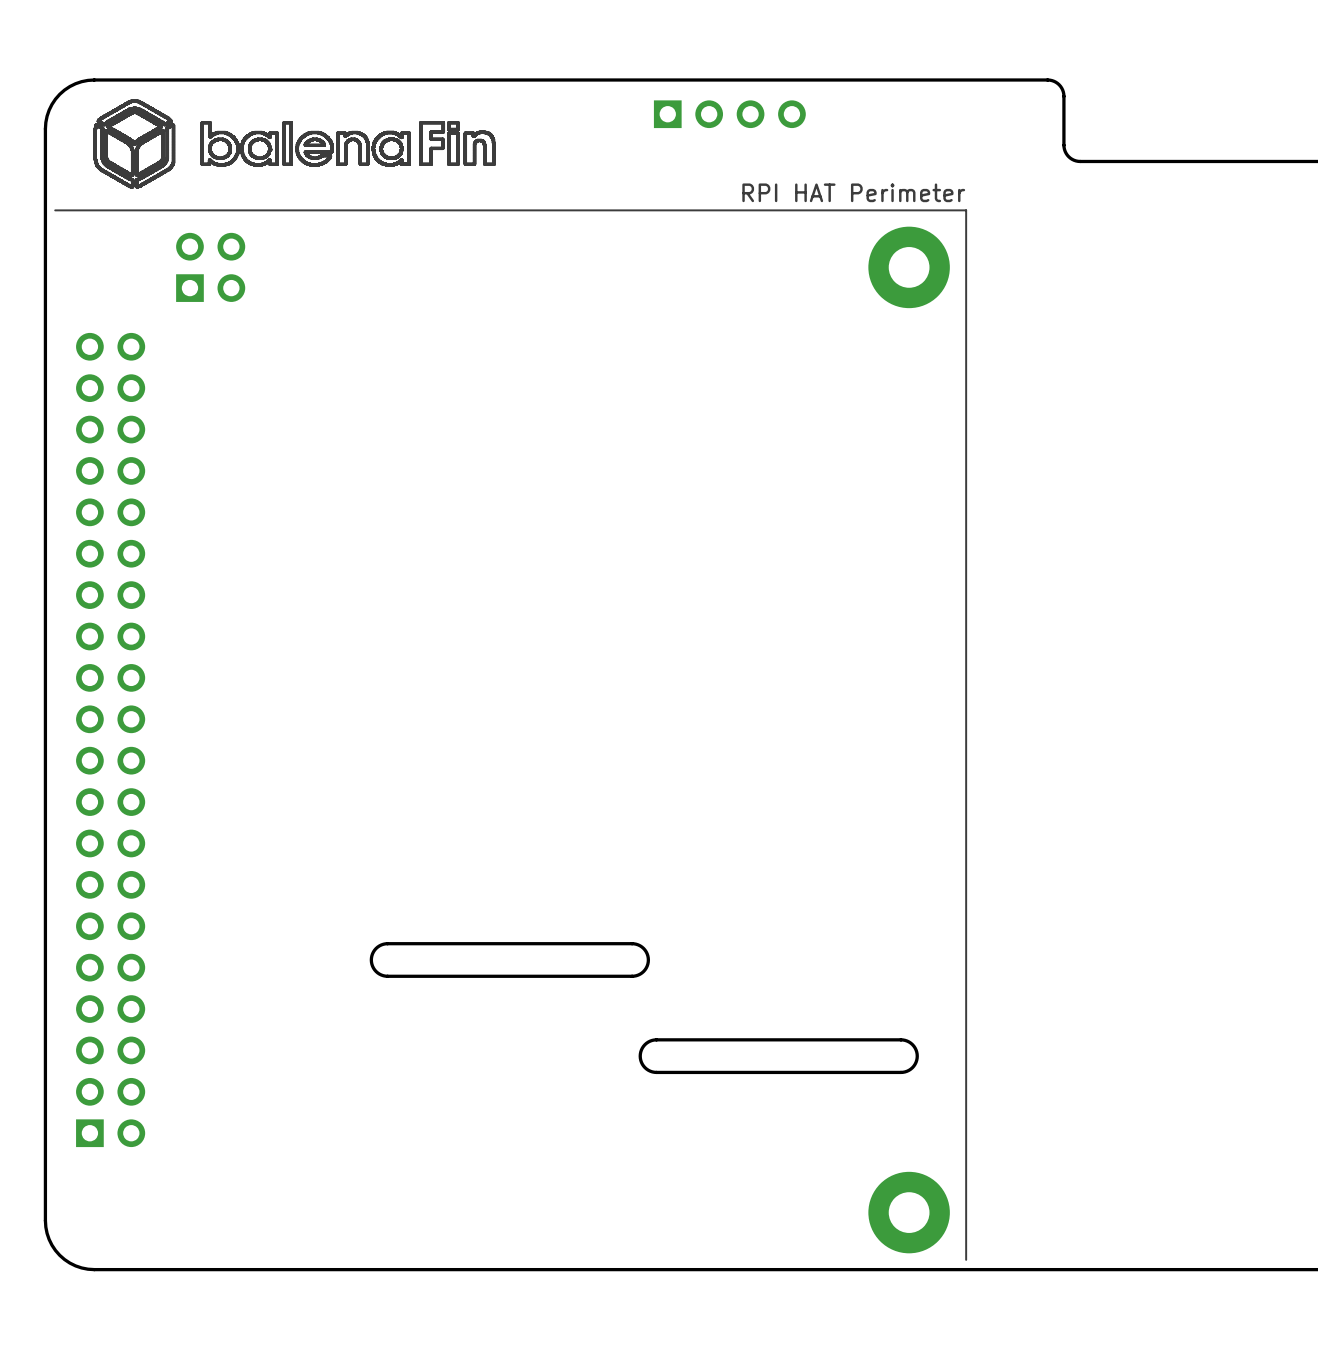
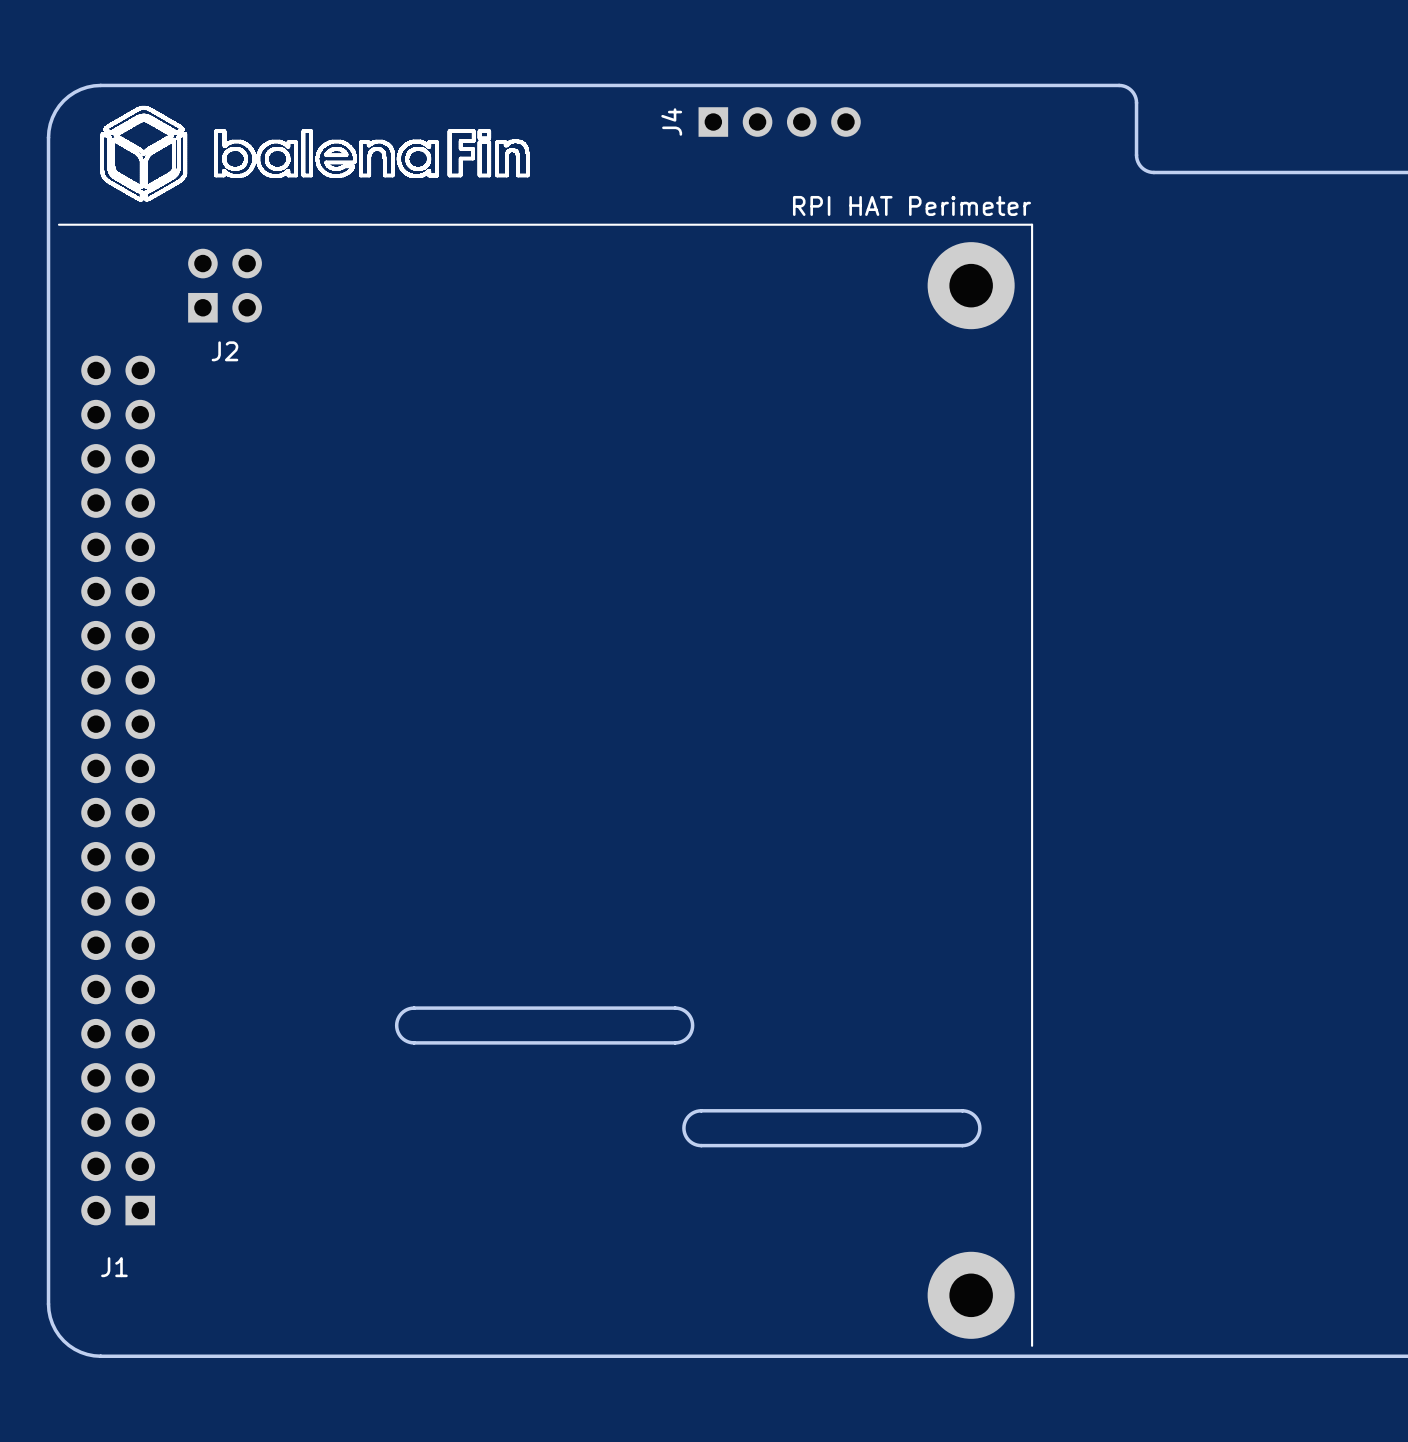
J4 name: none -> J4 (671, 122)
J2 name: none -> J2 (224, 351)
part: (110, 739) -> none
J1: none -> (118, 790)

